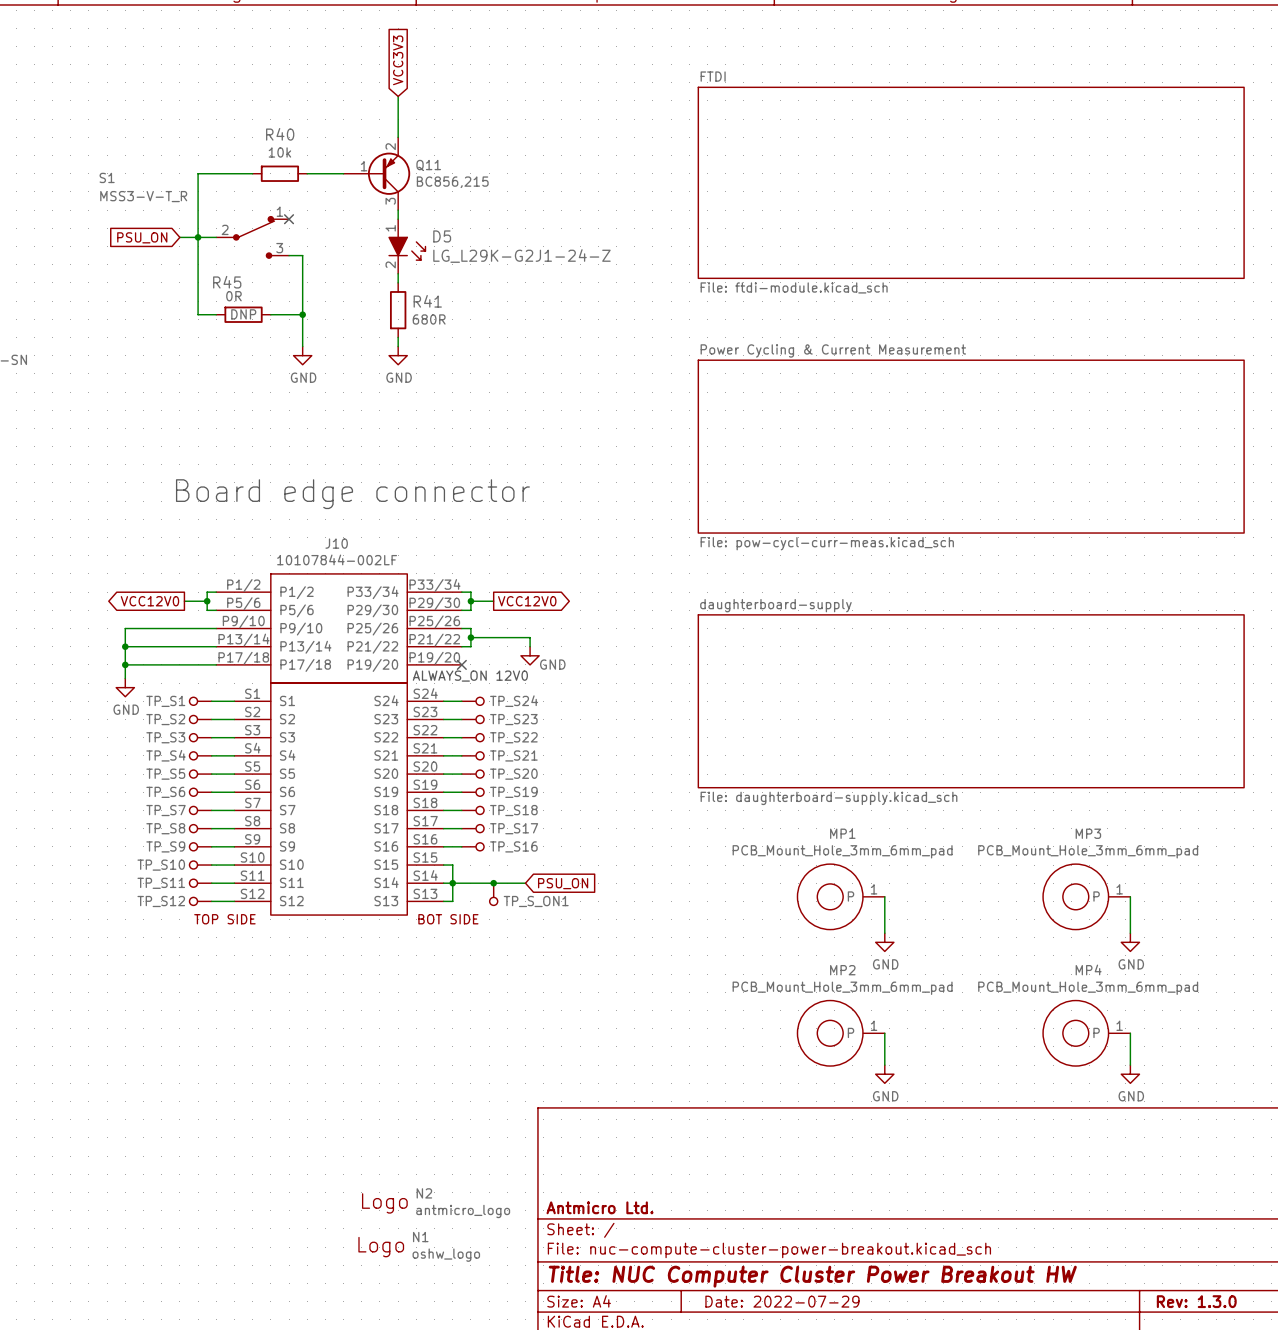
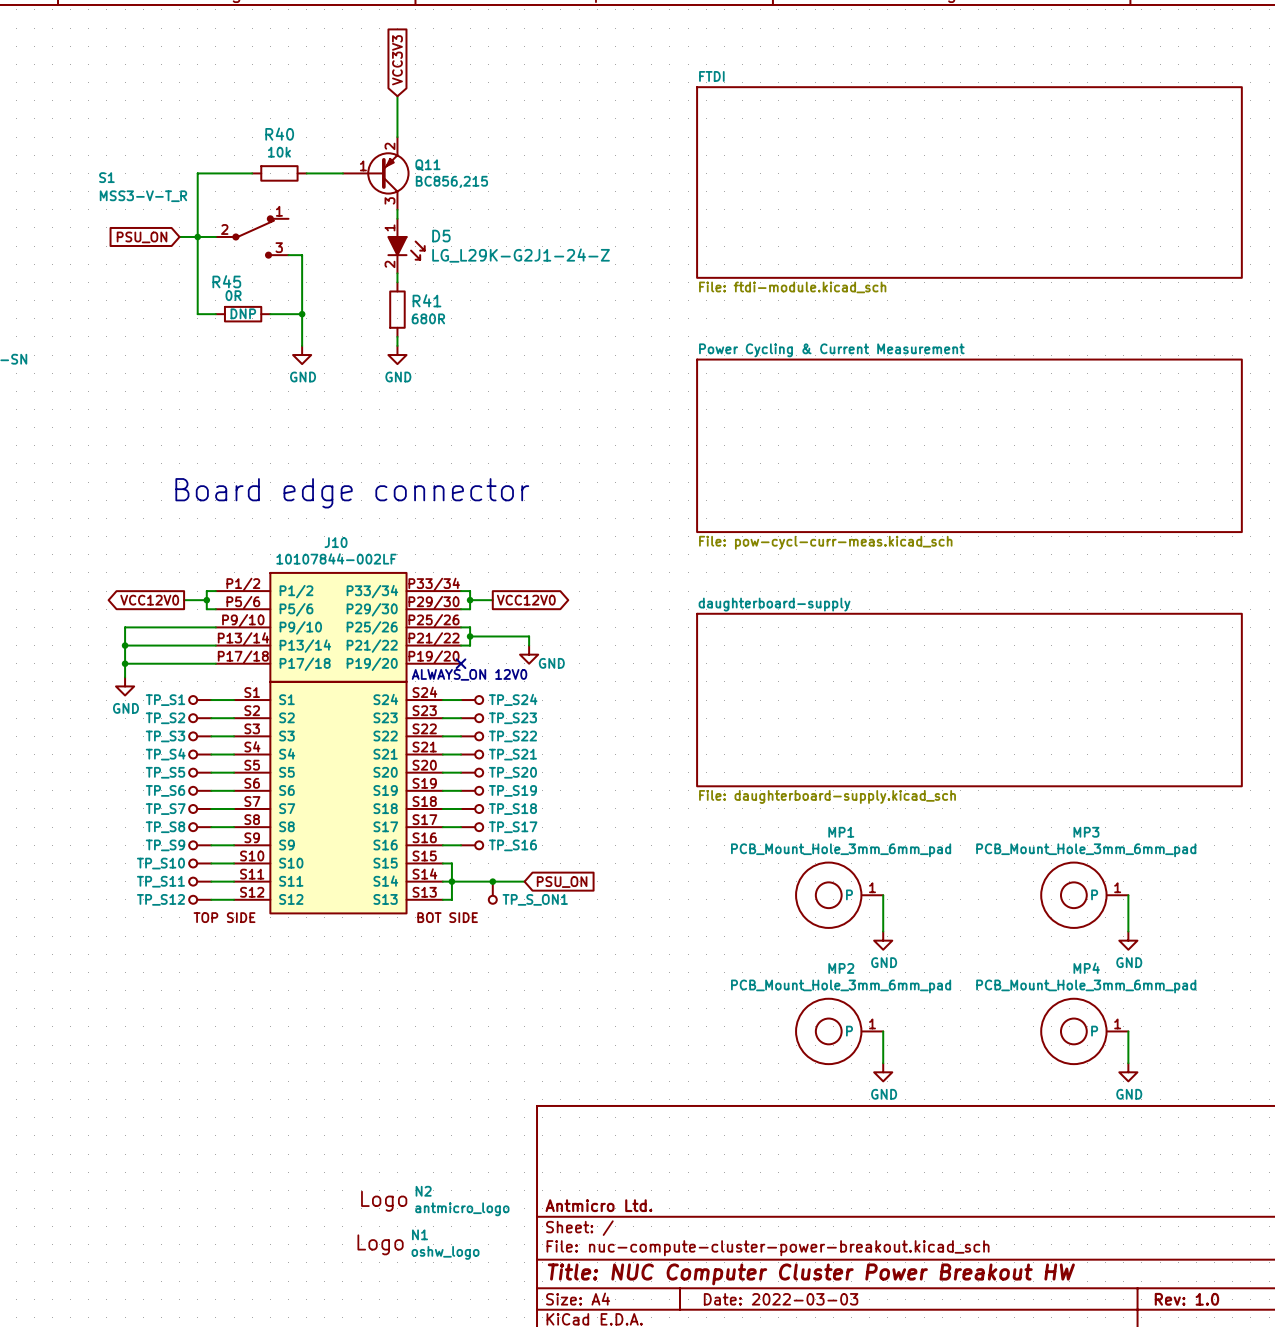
no-connect mark: (289, 219) -> none
title block: Date: 2022-07-29 (782, 1301) -> Date: 2022-03-03 (781, 1299)
title block: Rev: 1.3.0 (1196, 1301) -> Rev: 1.0 (1186, 1299)

